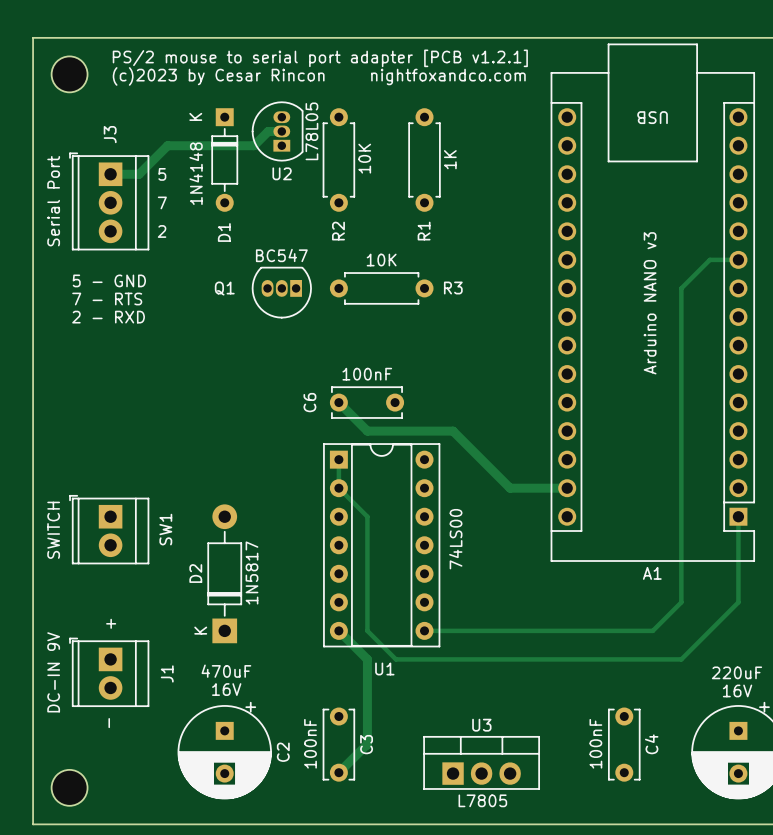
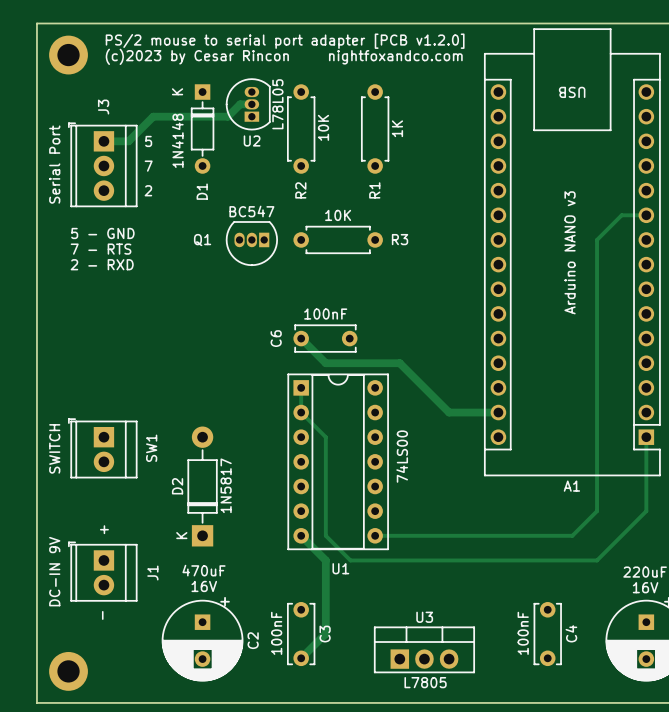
part footprint: [51, 56, 88, 93] -> [49, 35, 88, 75]
text: PS/2 mouse to serial port adapter [PCB v1.2.1] (320, 58) -> PS/2 mouse to serial port adapter [PCB v1.2.0] (285, 41)
part footprint: [51, 769, 88, 806] -> [49, 651, 88, 691]

